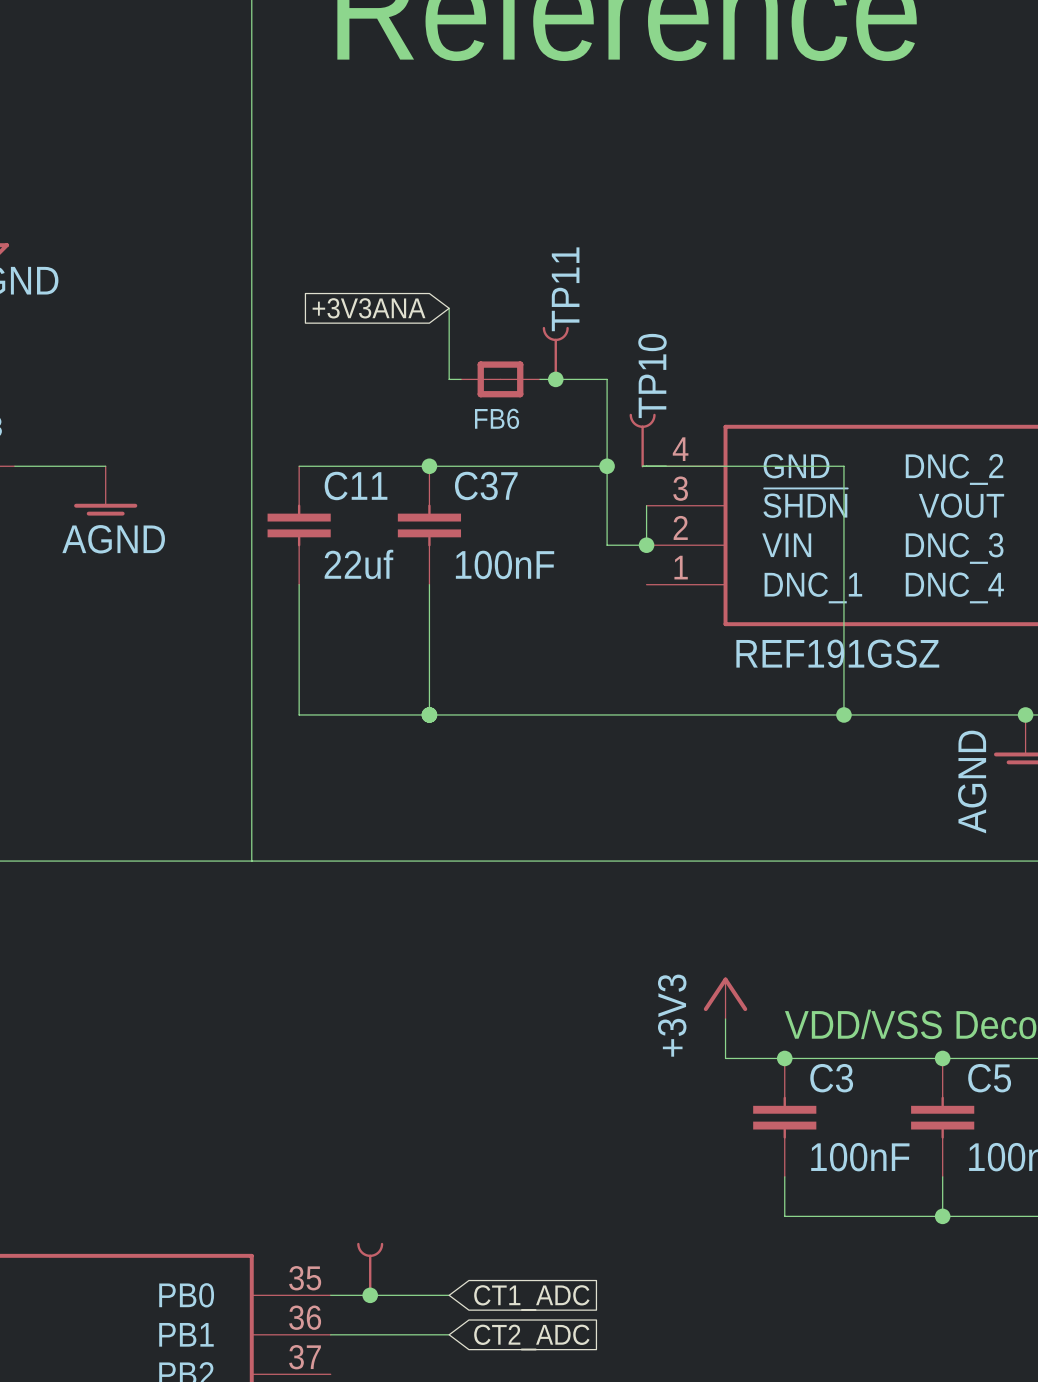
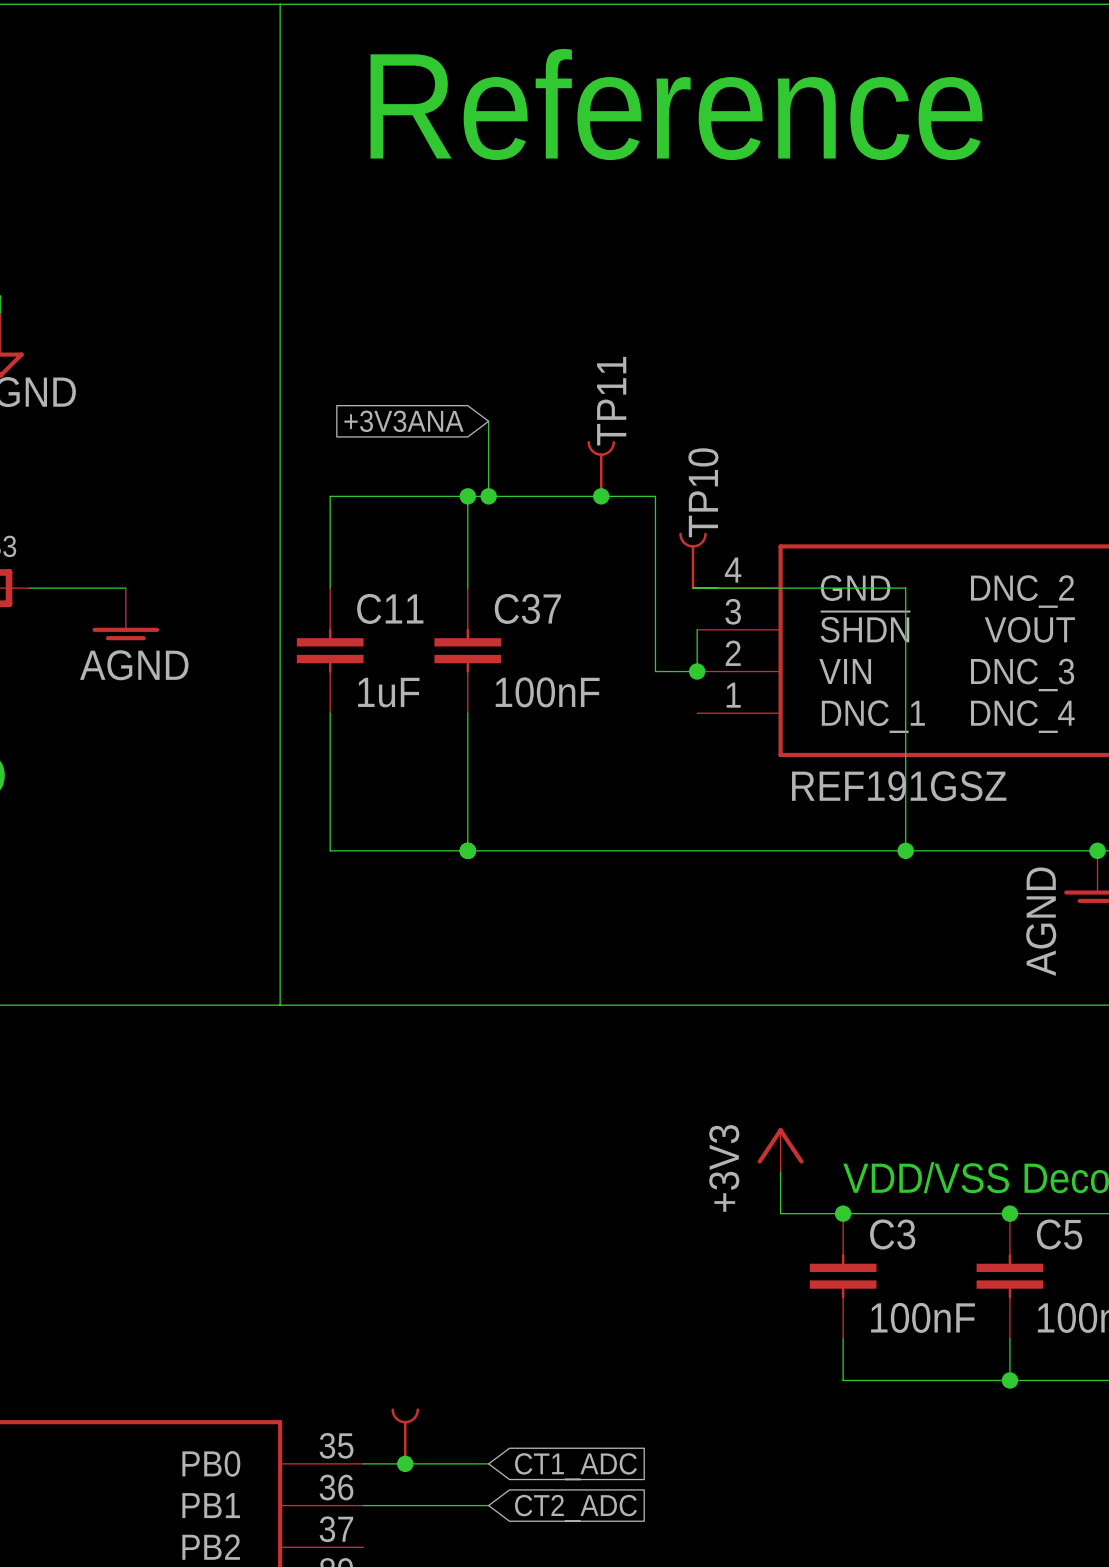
wire: none -> (467, 496) (467, 588)
junction: none -> (467, 496)
junction: none -> (488, 496)
FB6: (500, 379) -> none
wire: (299, 466) (607, 466) -> (330, 588) (330, 496) (488, 496)
junction: (429, 466) -> none
junction: (607, 466) -> none
C11 value: 22uf (358, 564) -> 1uF (388, 692)

